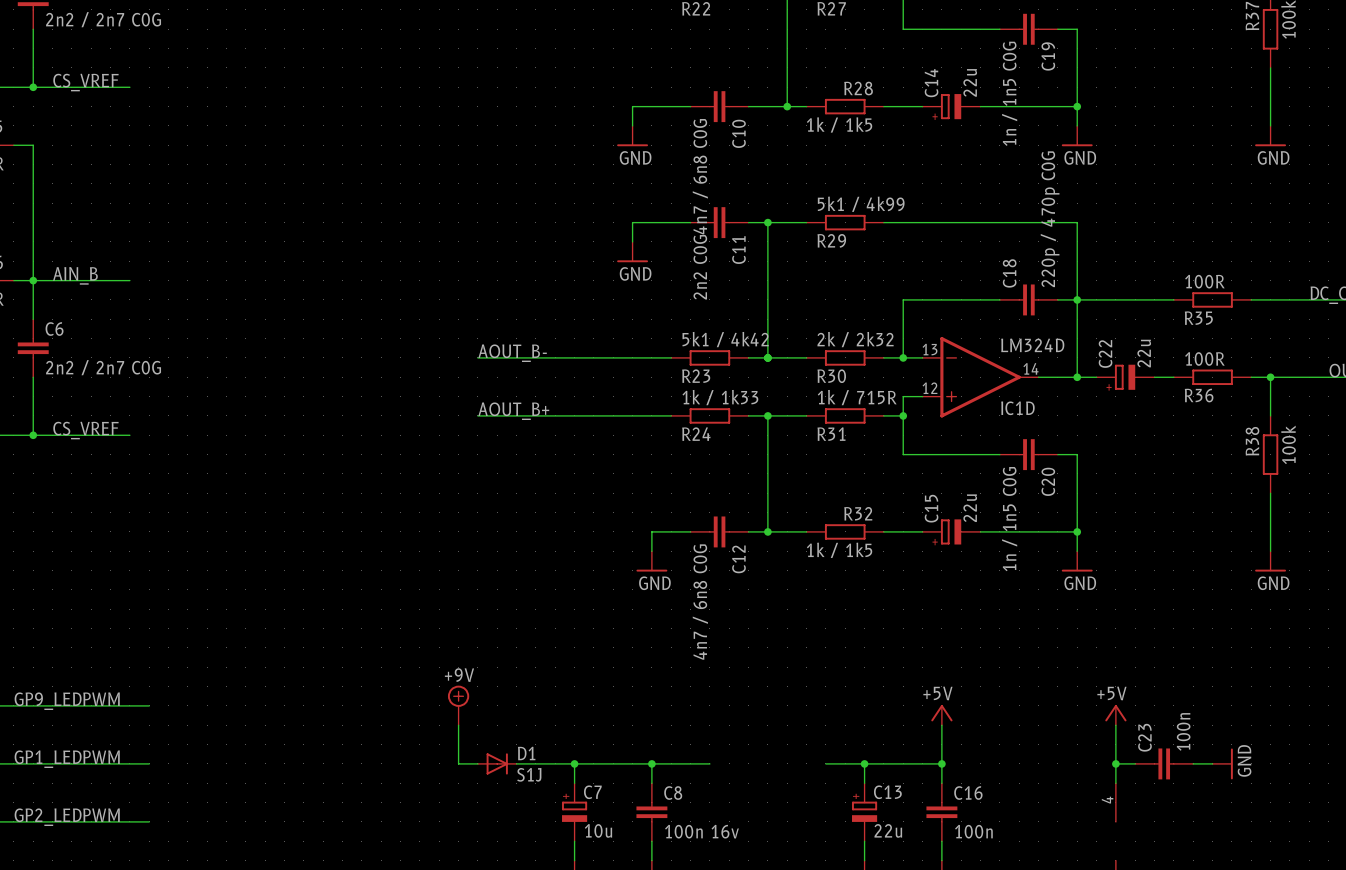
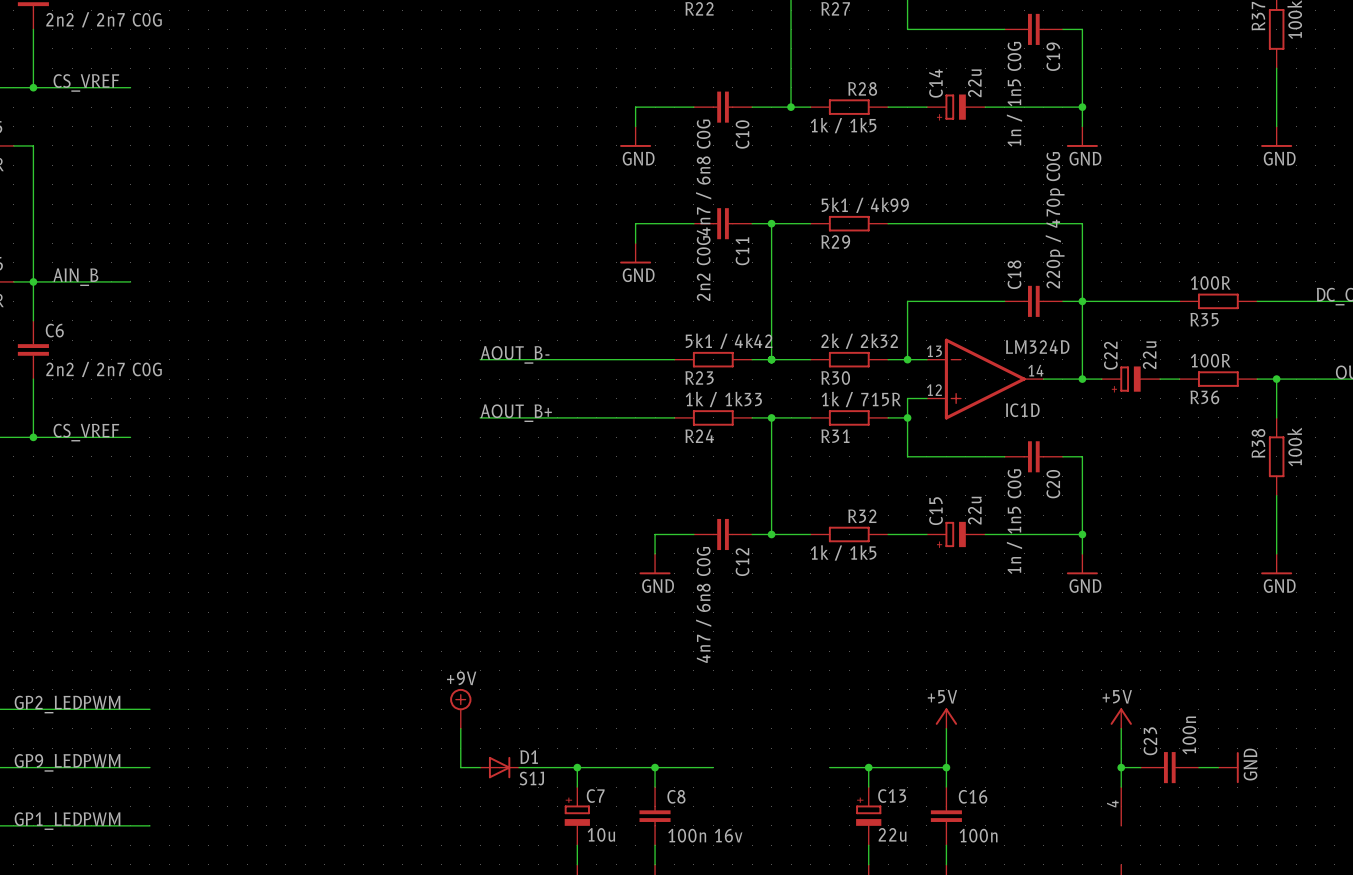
label: GP9_LEDPWM (67, 701) -> GP2_LEDPWM (67, 704)
label: GP1_LEDPWM (67, 759) -> GP9_LEDPWM (67, 762)
label: GP2_LEDPWM (67, 817) -> GP1_LEDPWM (67, 821)

